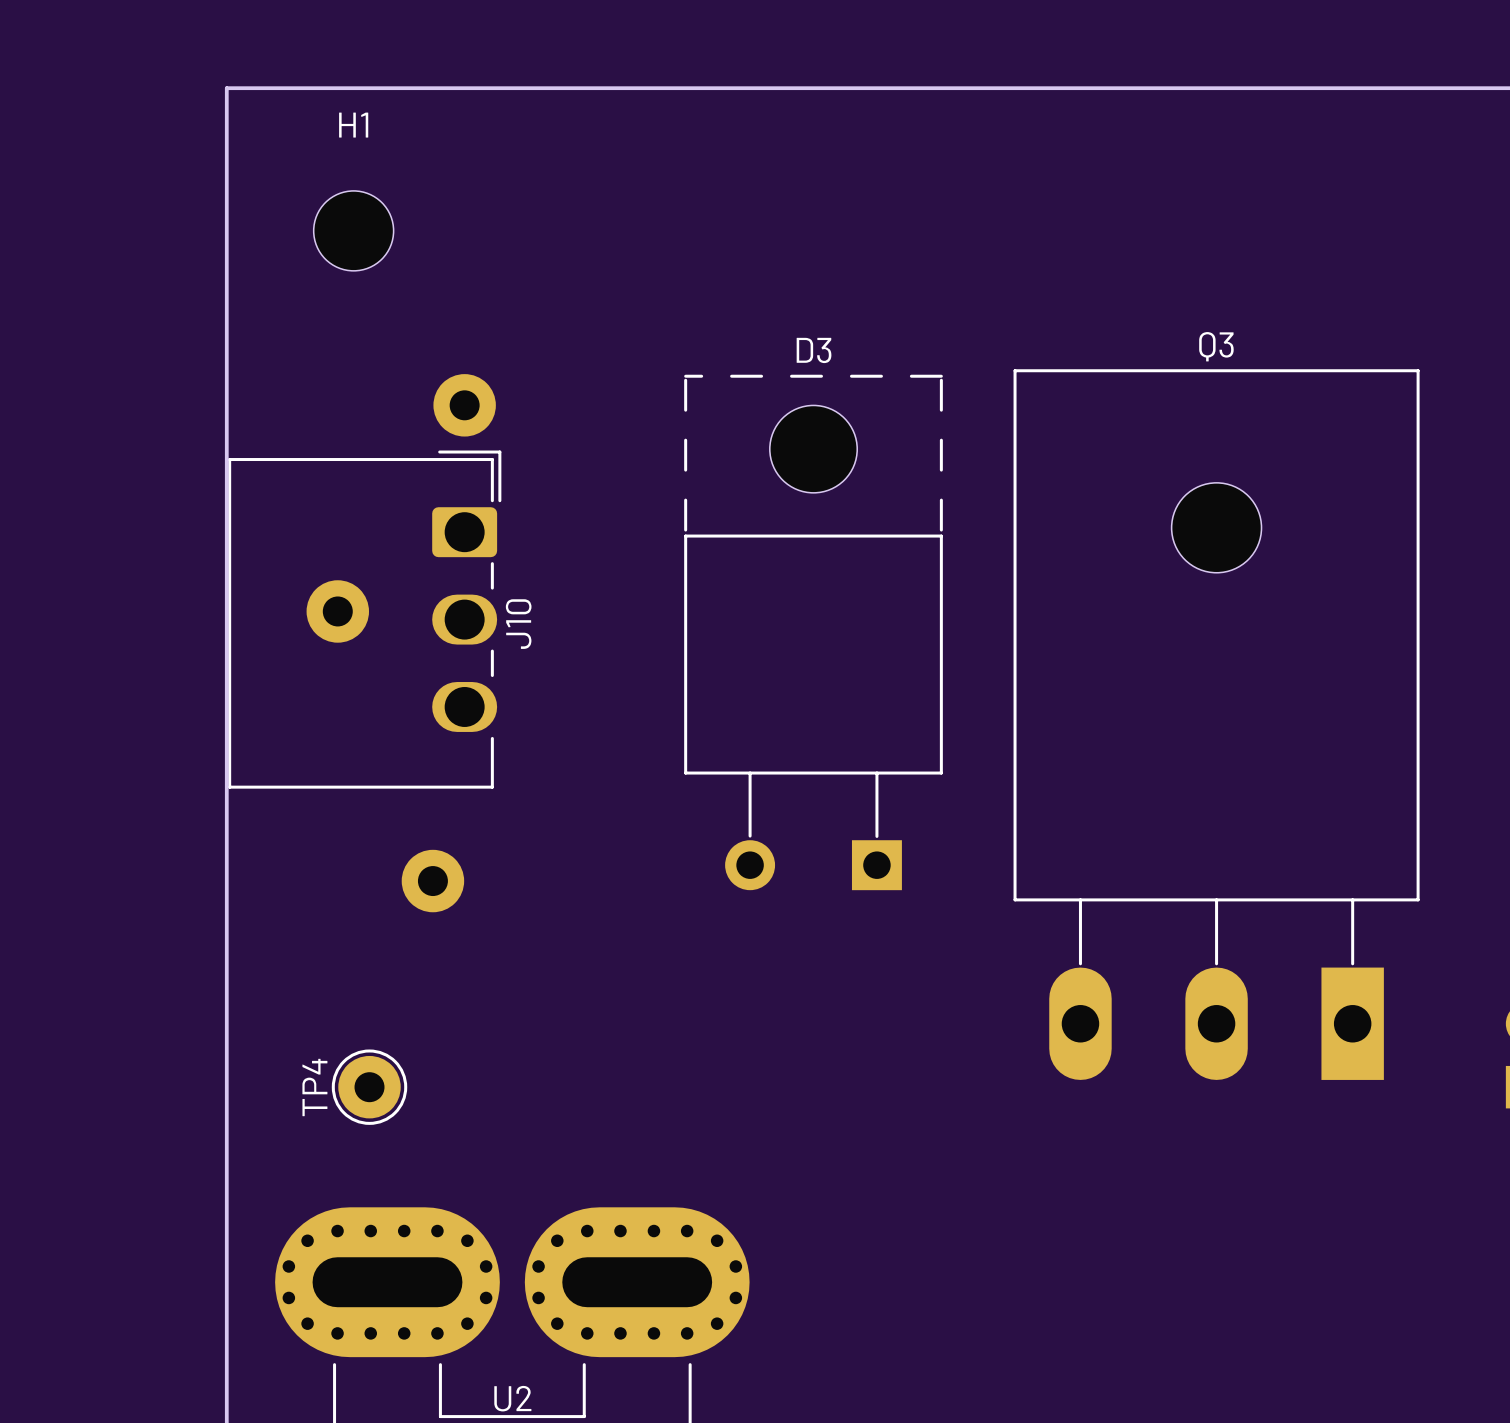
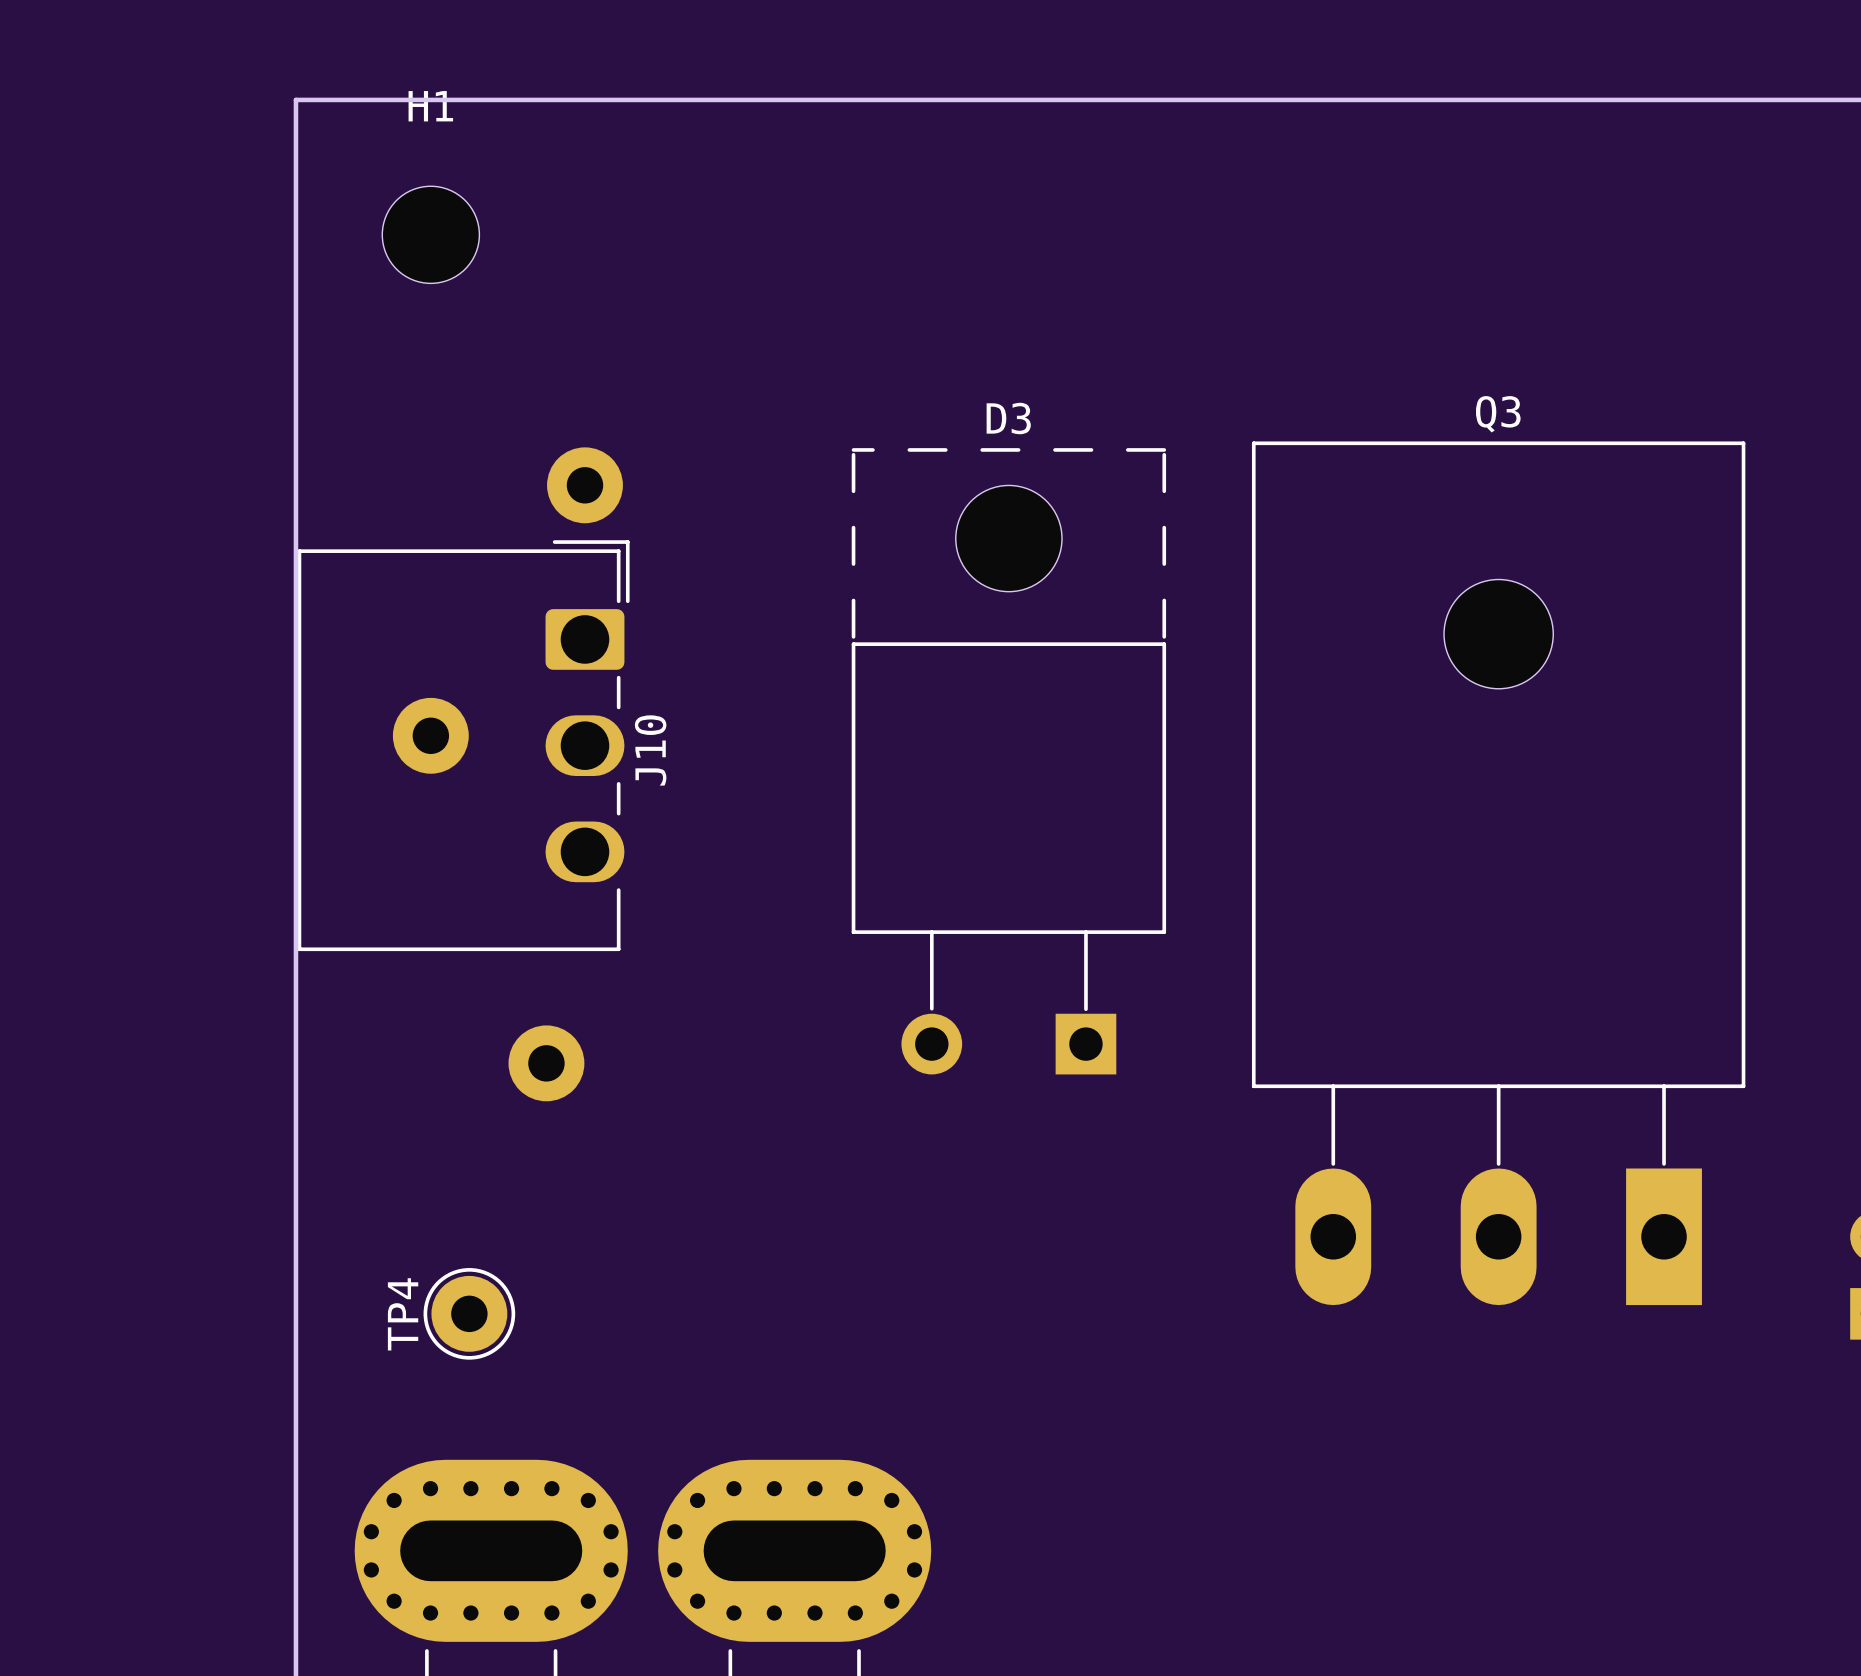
H1 position: (353, 230) -> (430, 234)

